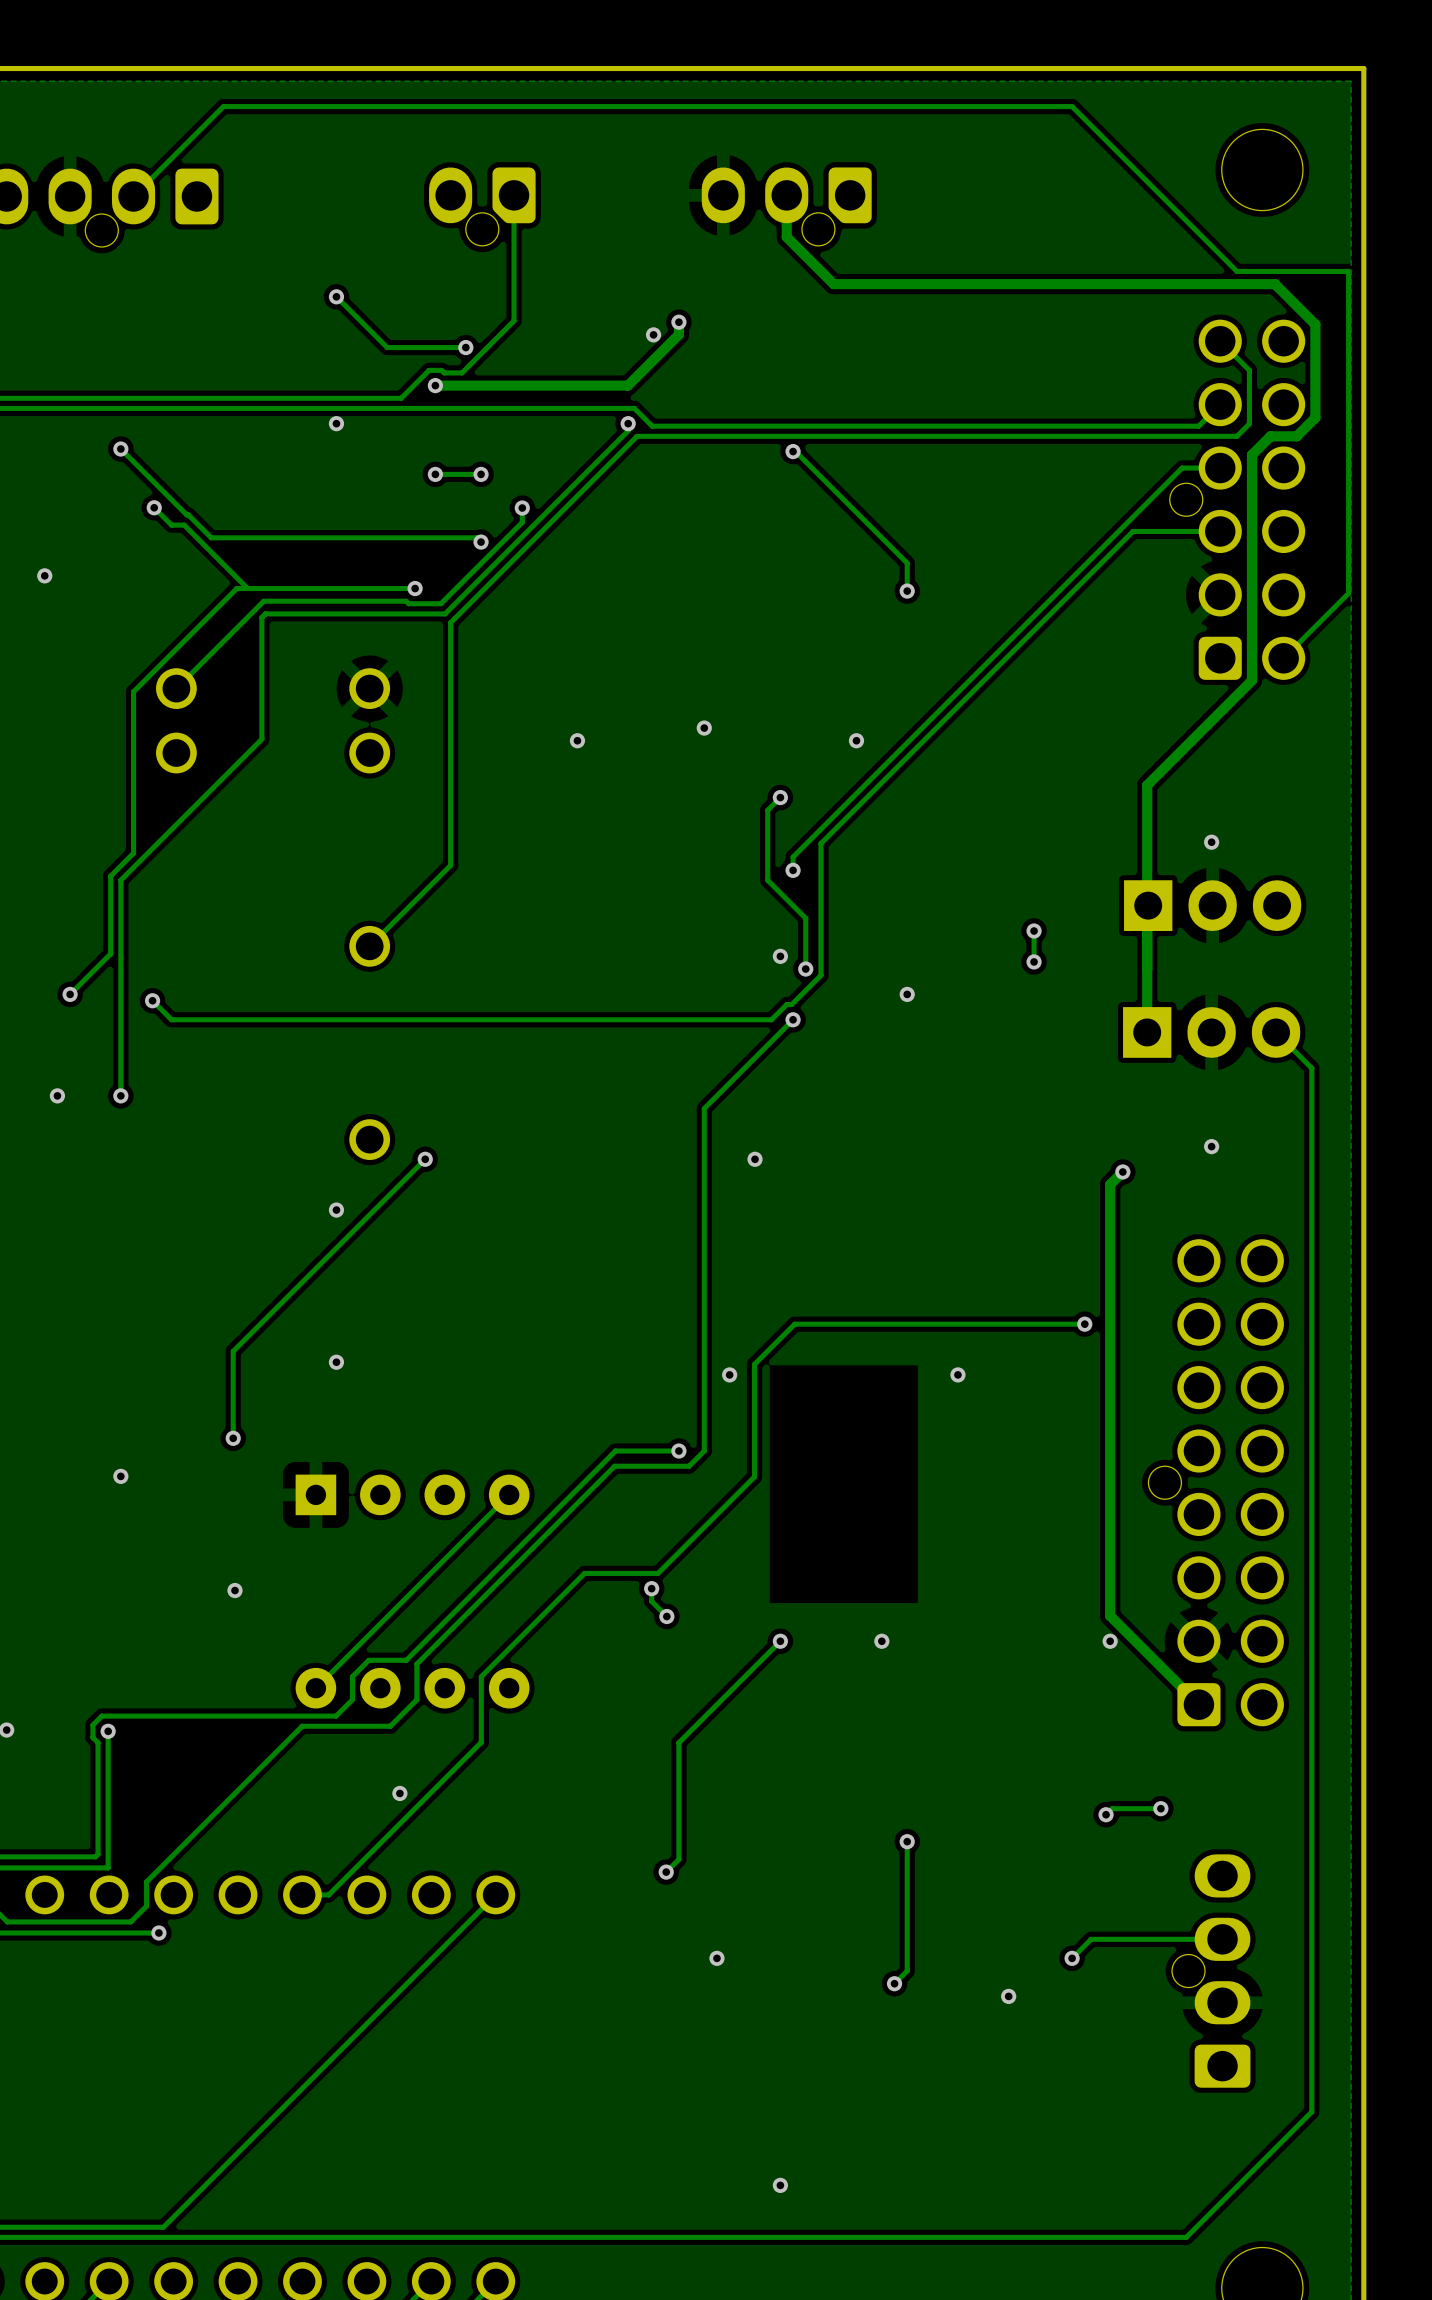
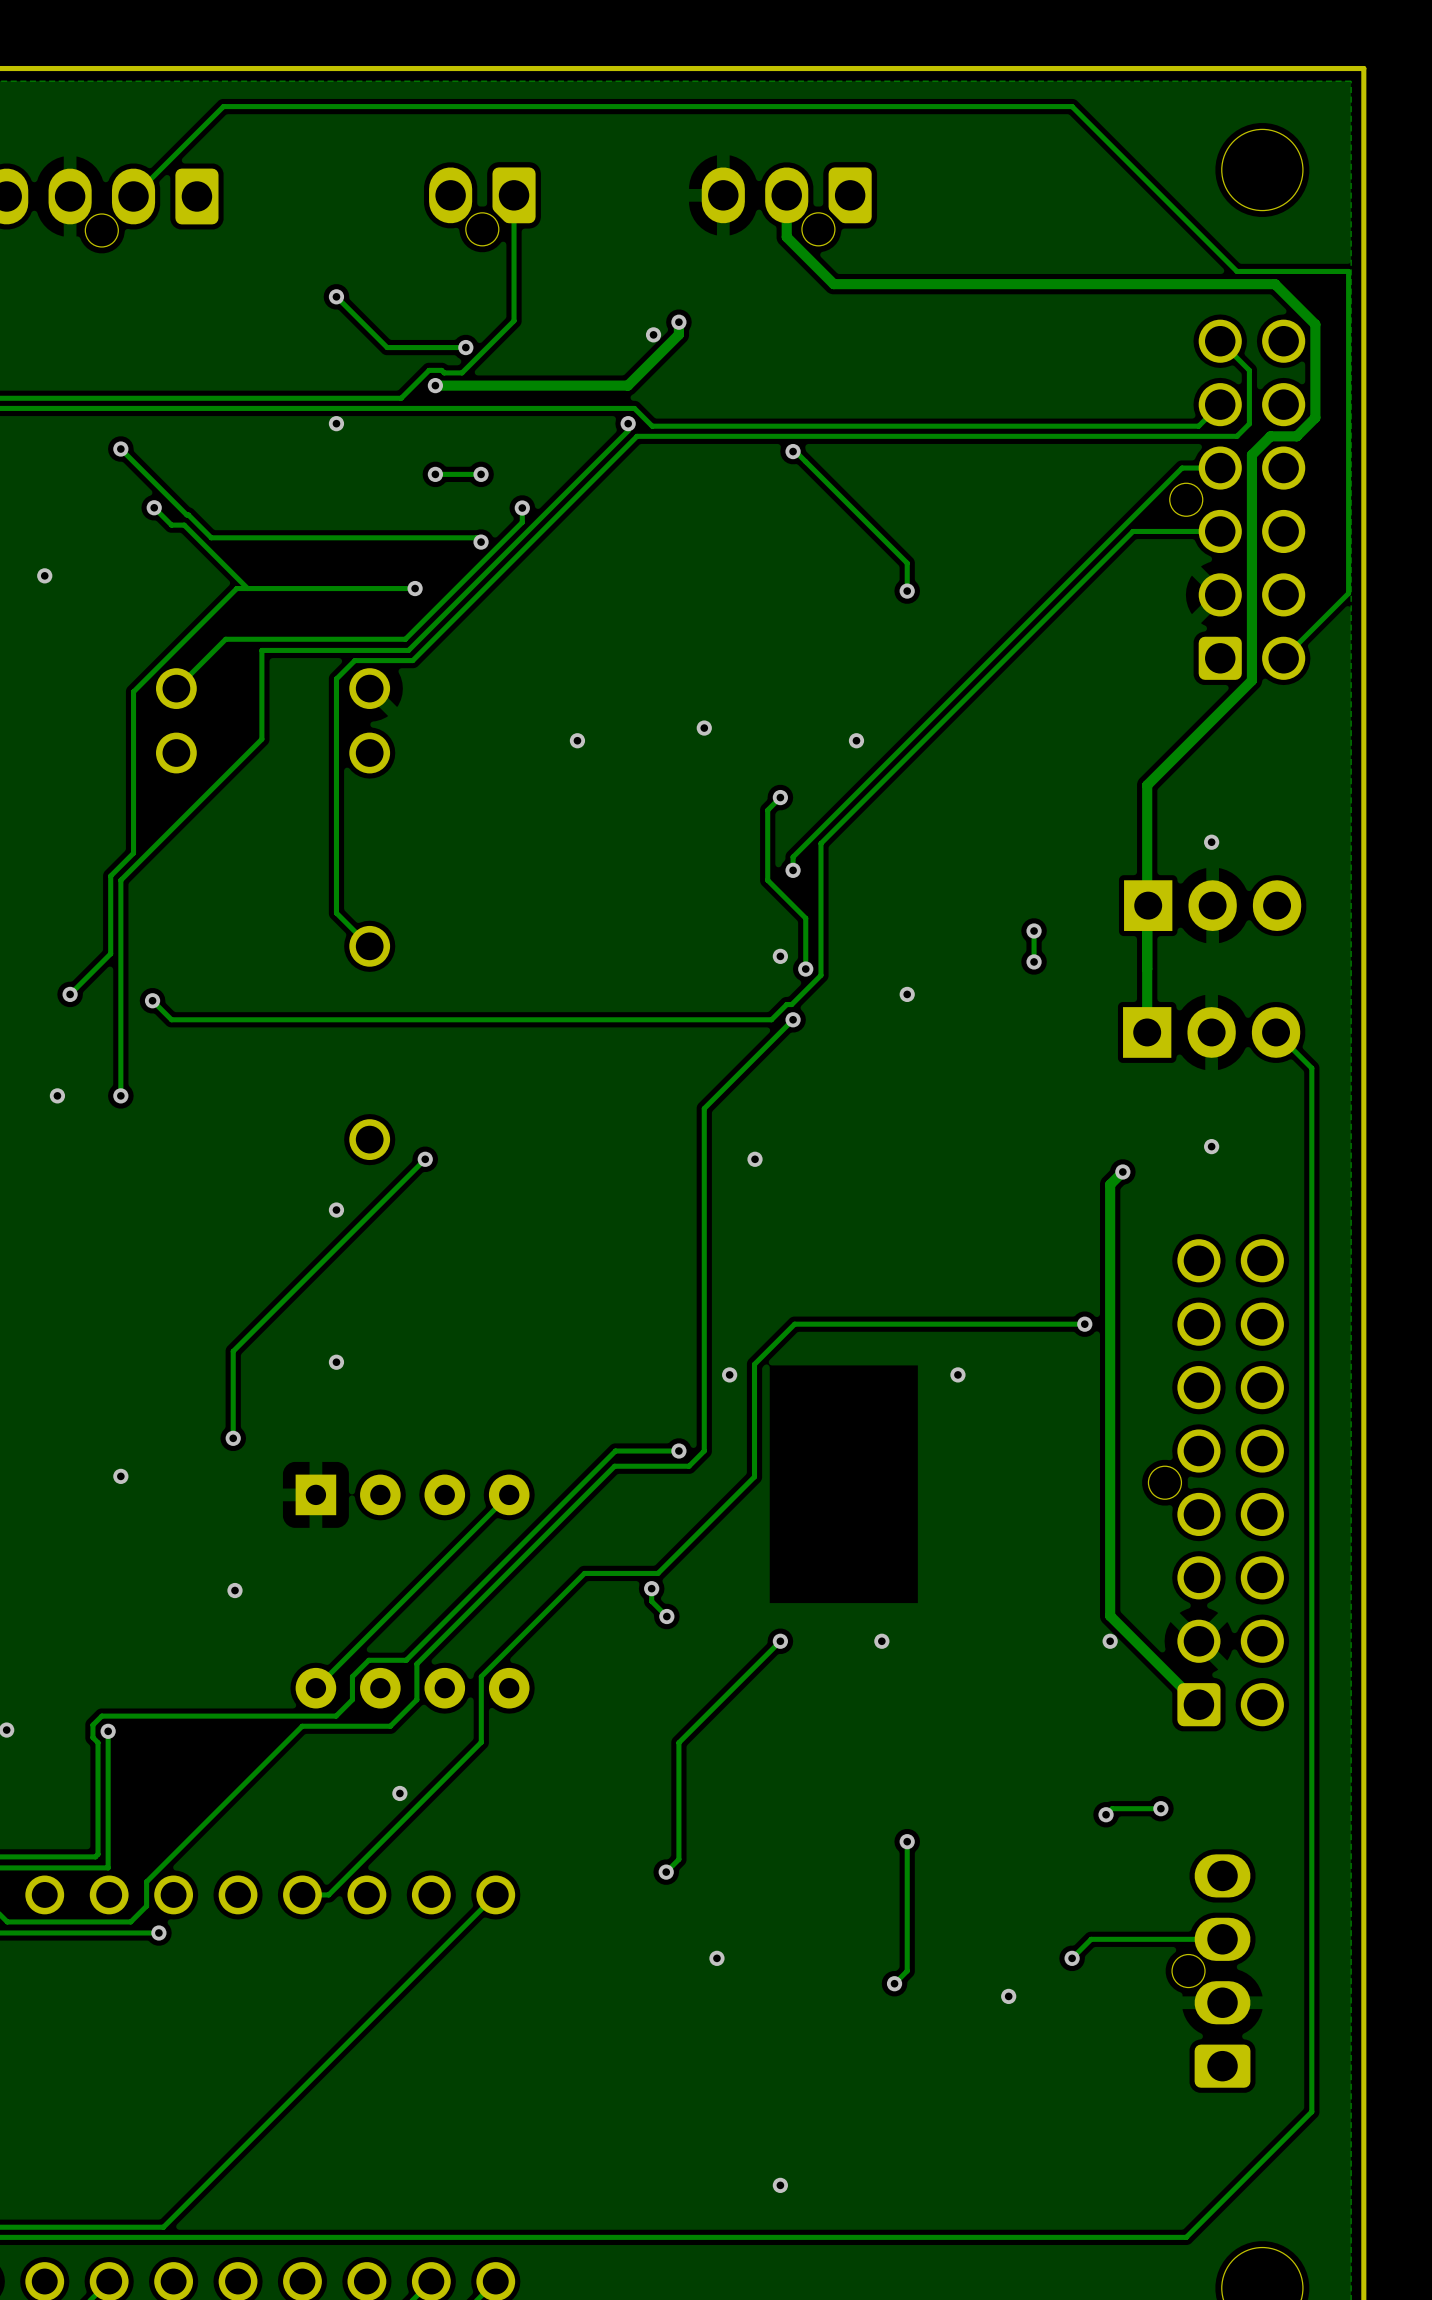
track: (440, 603) (408, 603) (406, 601) (263, 601) (225, 639) -> (440, 603) (405, 639) (225, 639)
track: (445, 613) (265, 613) (261, 617) (261, 650) -> (445, 613) (408, 650) (261, 650)
track: (450, 622) (450, 865) (369, 946) -> (450, 622) (412, 660) (354, 660) (336, 678) (336, 913) (369, 946)

